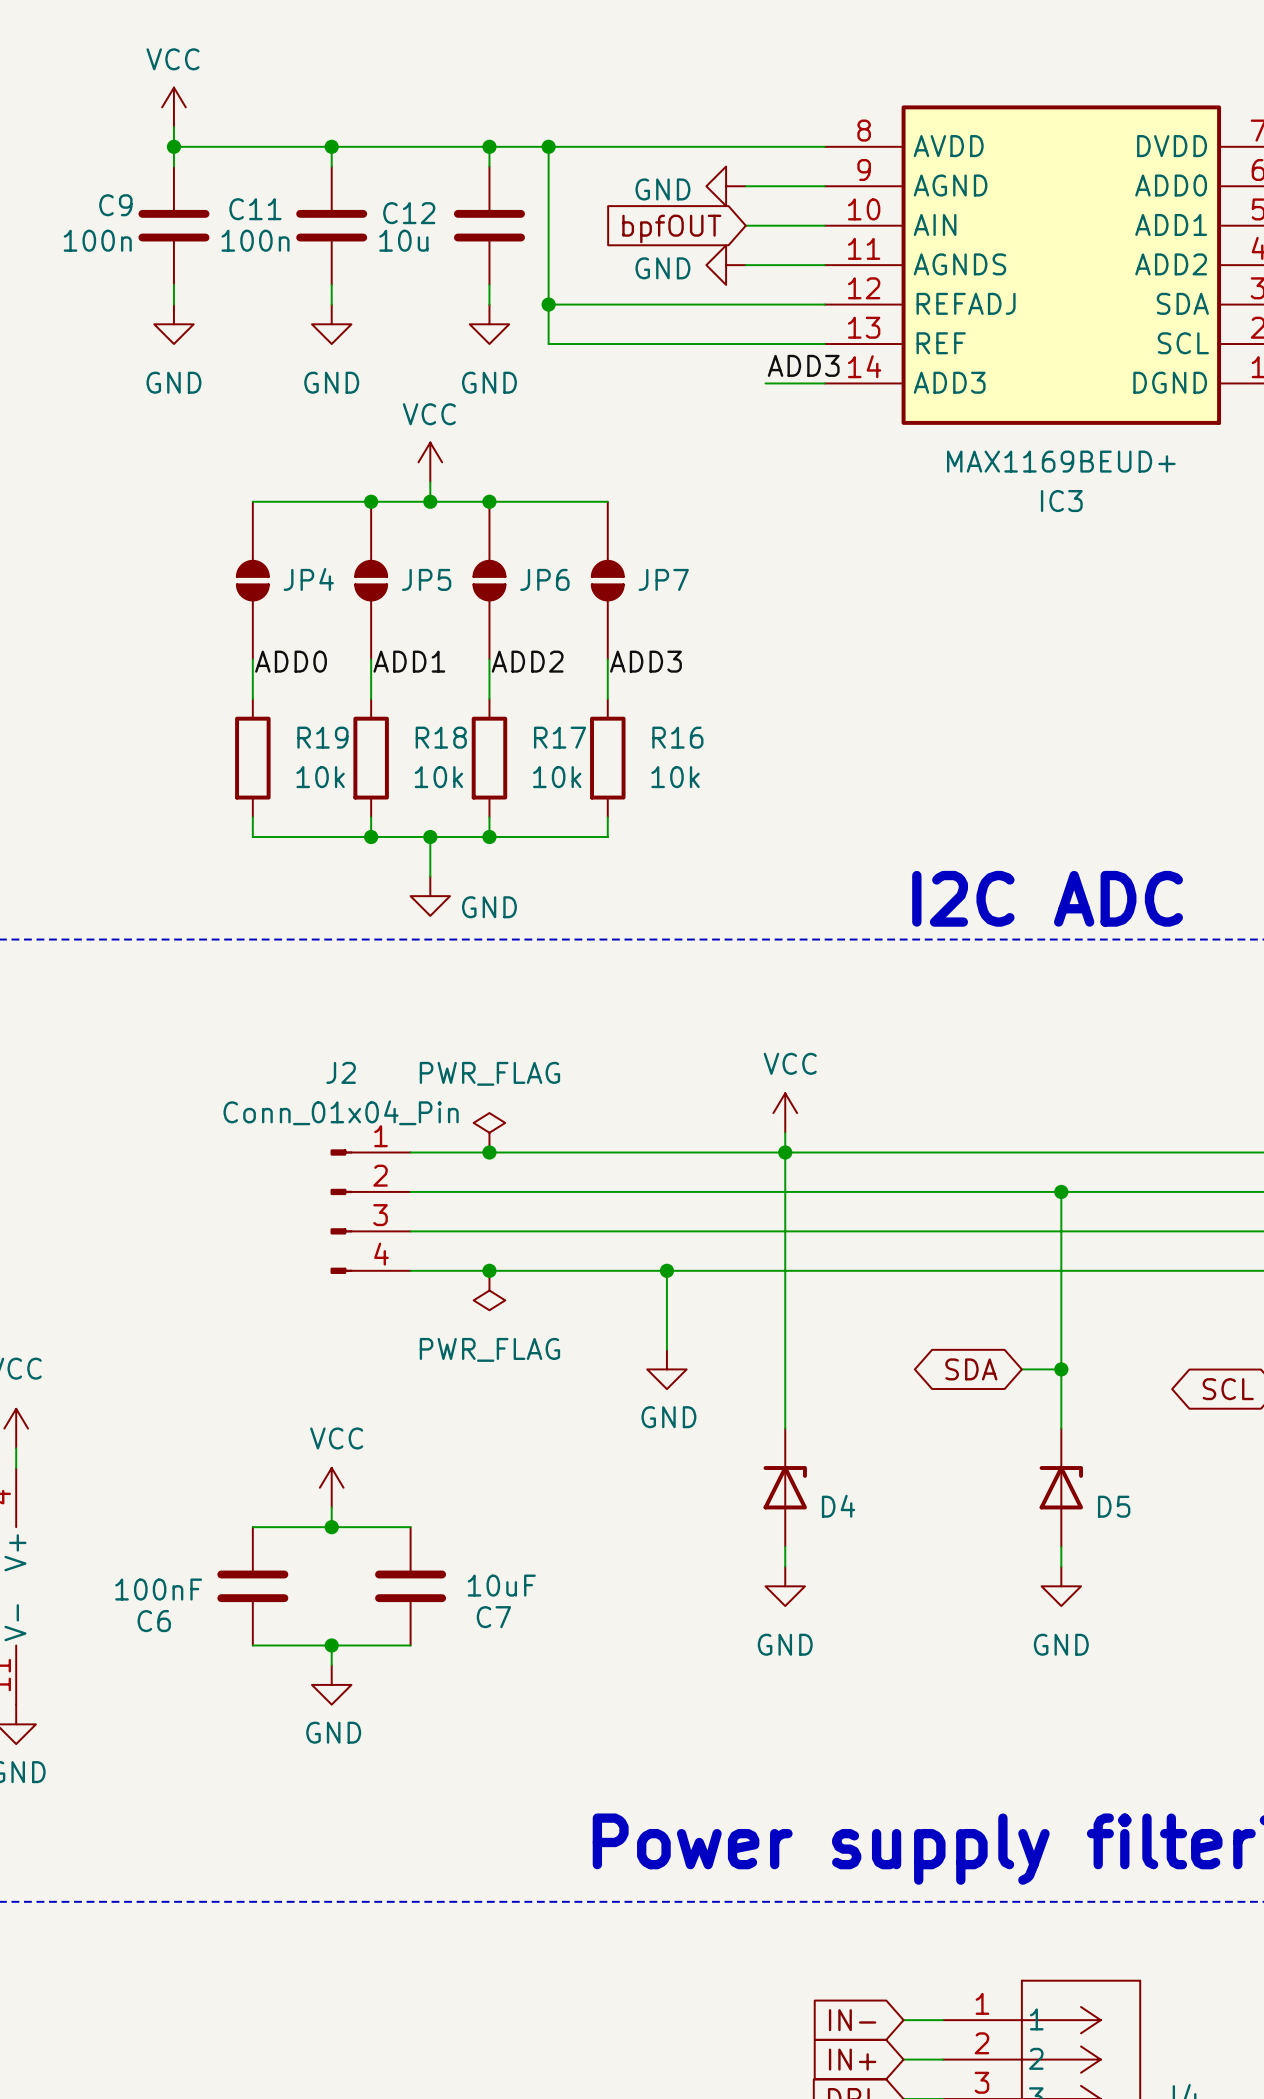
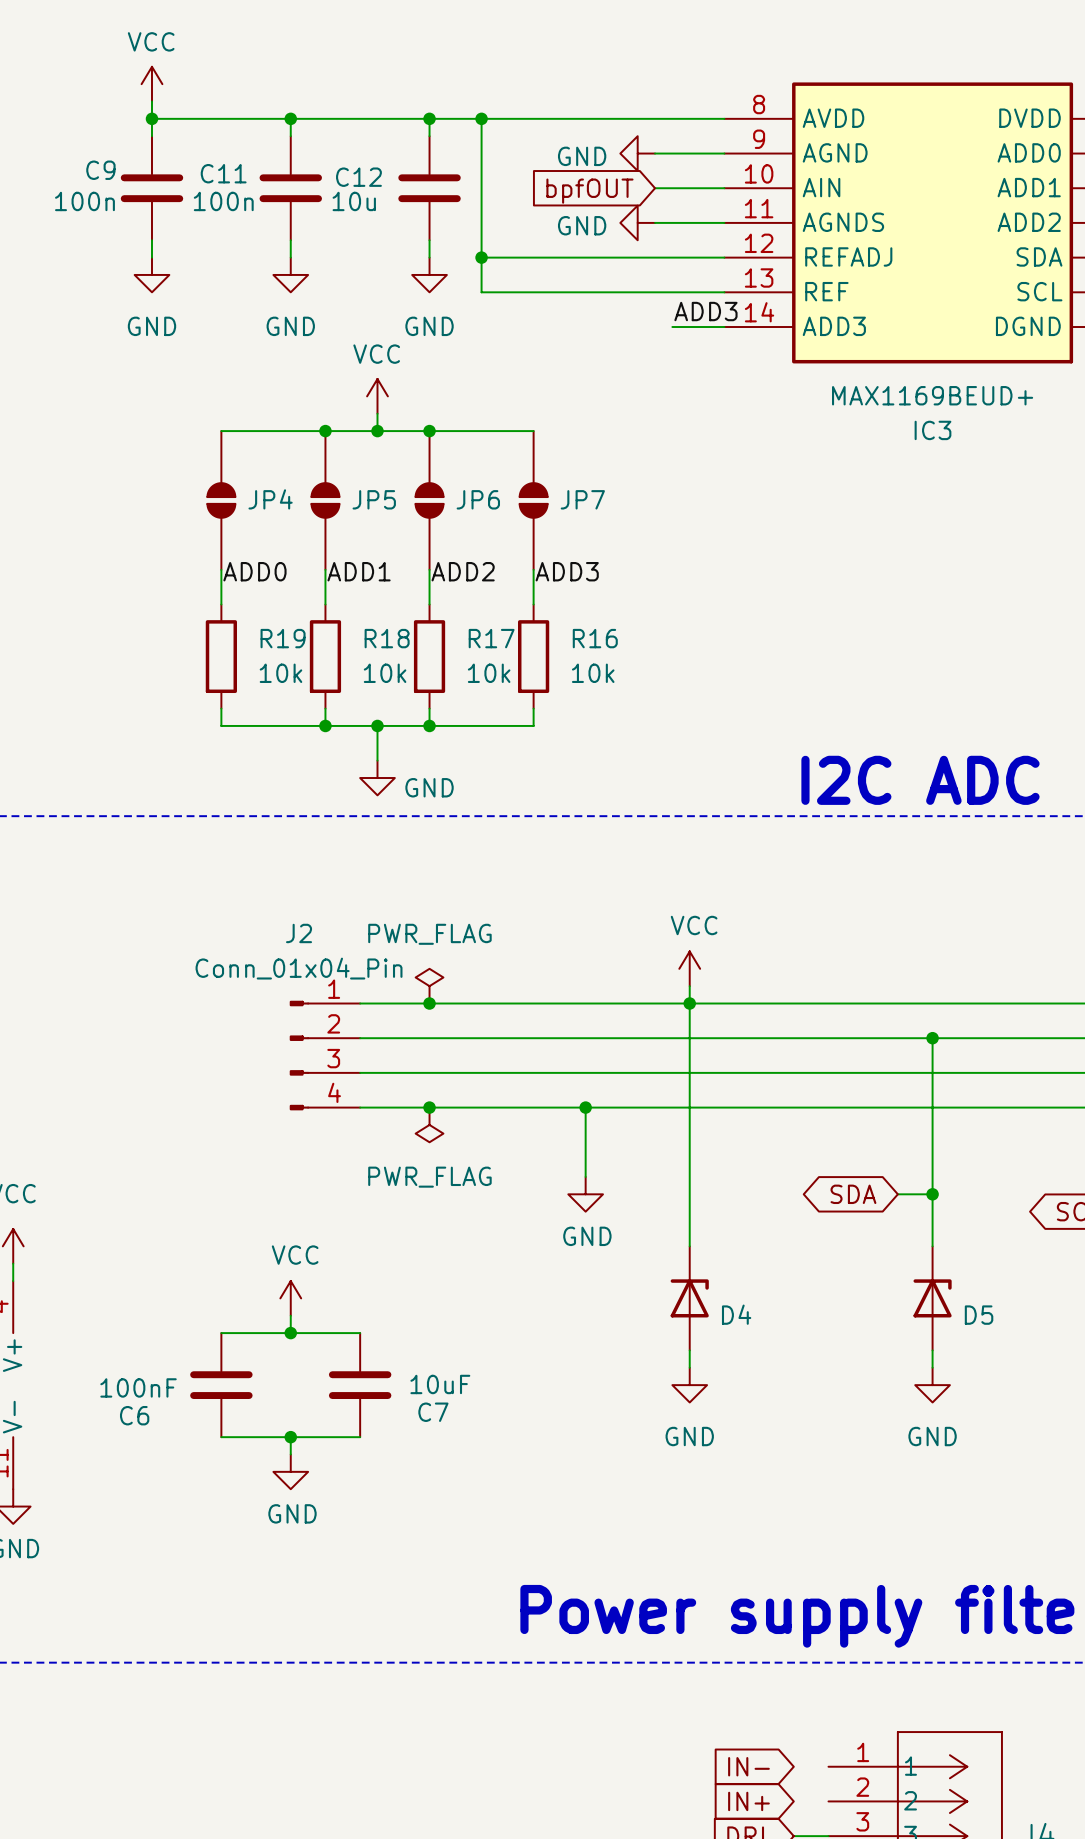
wire: (903, 2020) (943, 2020) -> none
wire: (903, 2059) (943, 2059) -> none

